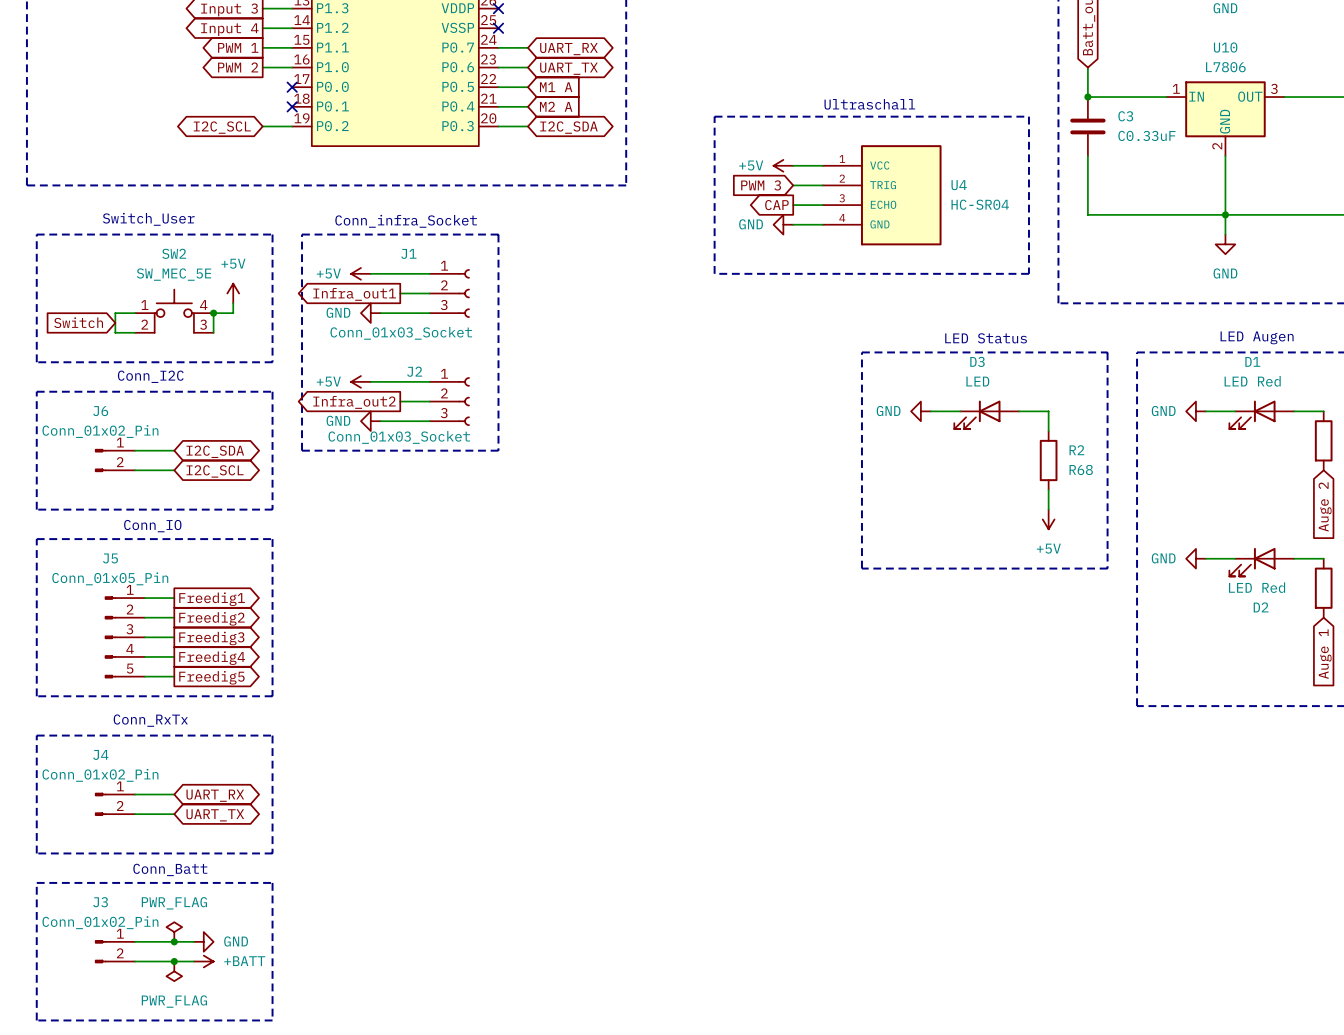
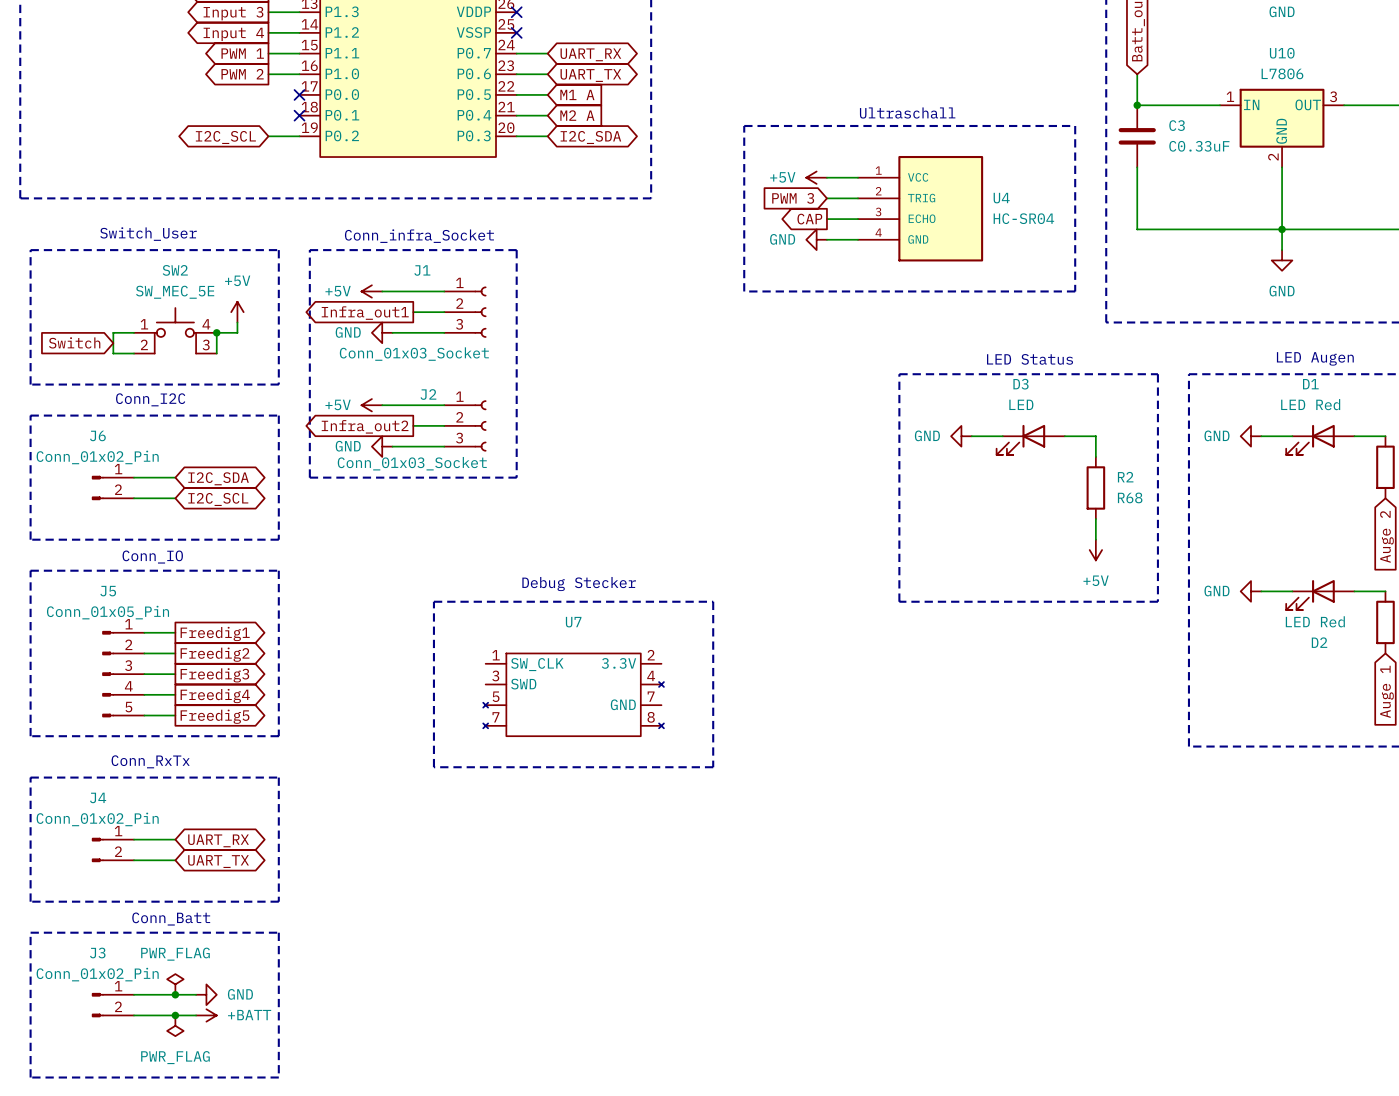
text: none -> Debug Stecker (579, 584)
line: none -> (433, 601) (713, 601) (713, 767) (433, 767) (433, 601)
U7: none -> (573, 694)

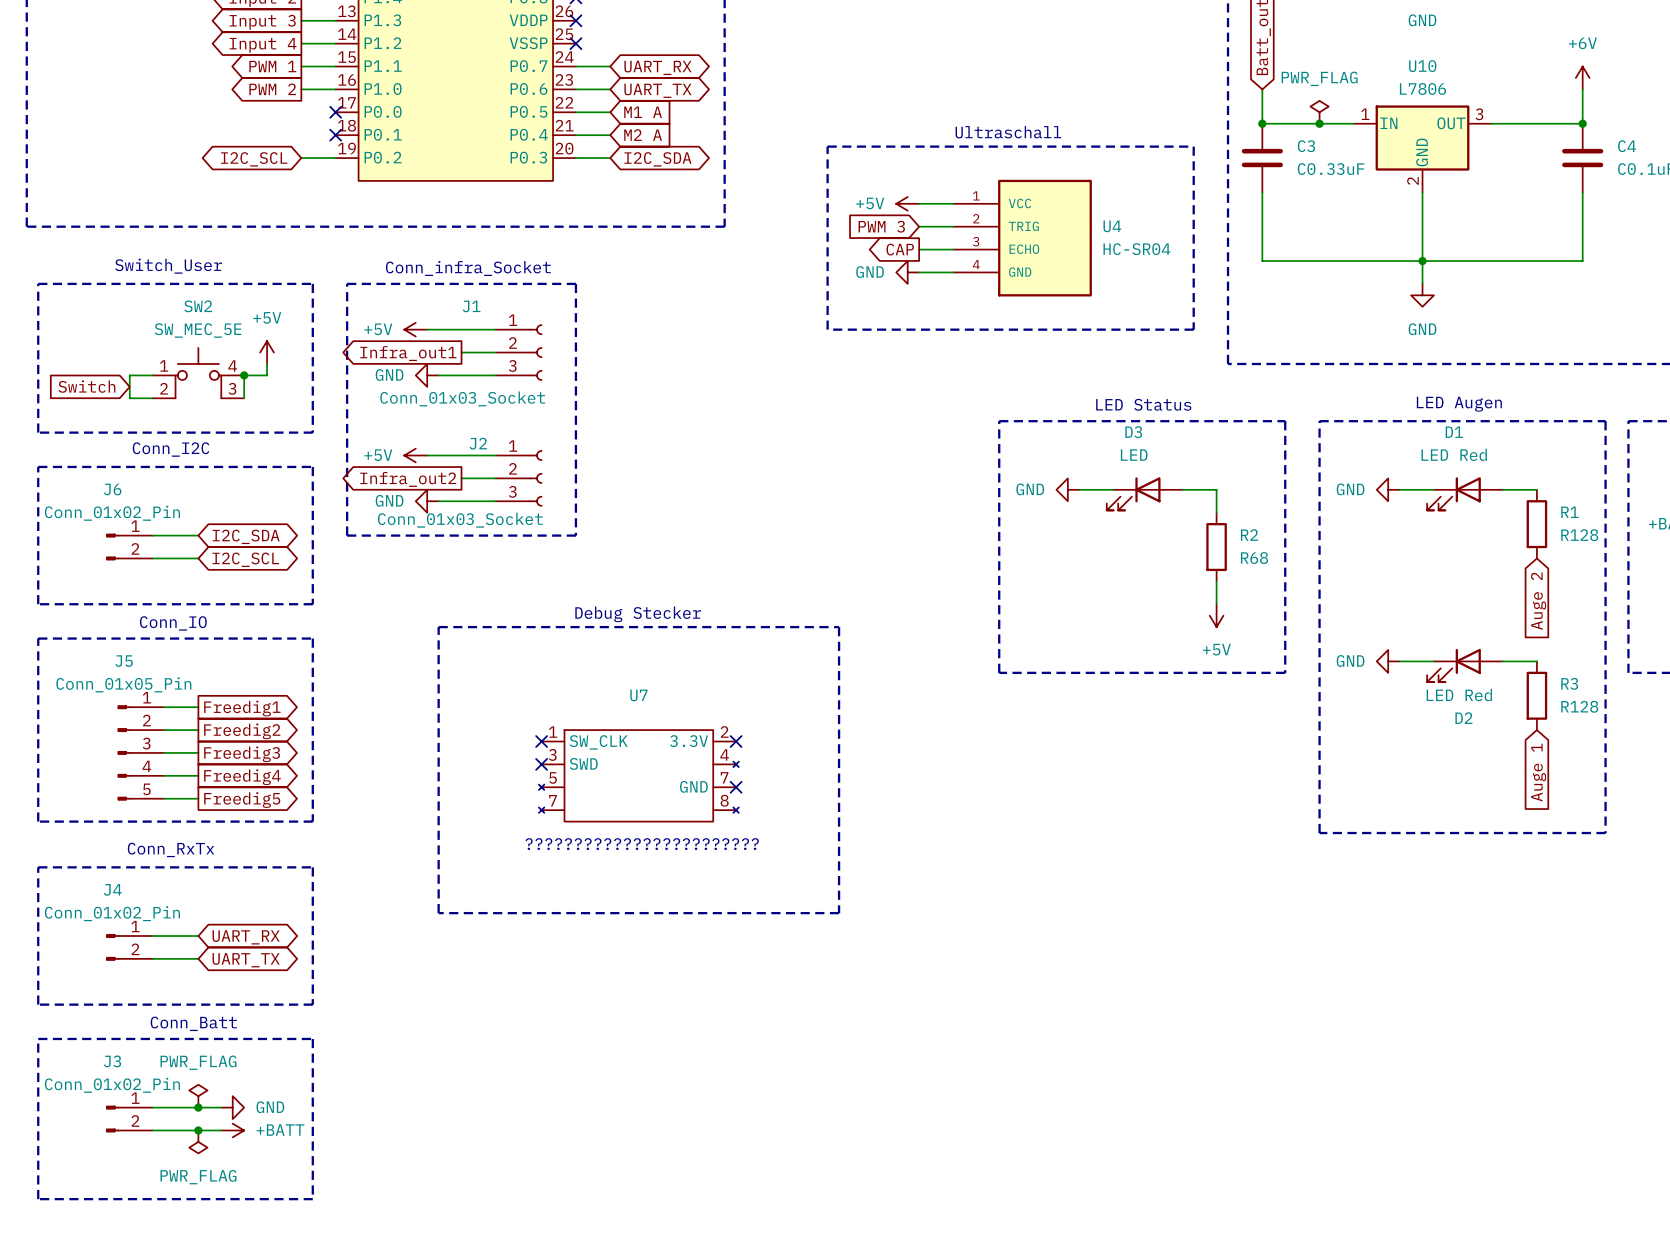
power symbol: none -> PWR_FLAG (1319, 112)
junction: none -> (1319, 123)
line: none -> (438, 627) (839, 627) (839, 913) (438, 913) (438, 627)
text position: Debug Stecker (579, 584) -> Debug Stecker (638, 614)
line: (433, 601) (713, 601) (713, 767) (433, 767) (433, 601) -> none
no-connect mark: none -> (541, 741)
no-connect mark: none -> (736, 741)
no-connect mark: none -> (541, 764)
no-connect mark: none -> (736, 787)
text: none -> ???????????????????????? (642, 844)

